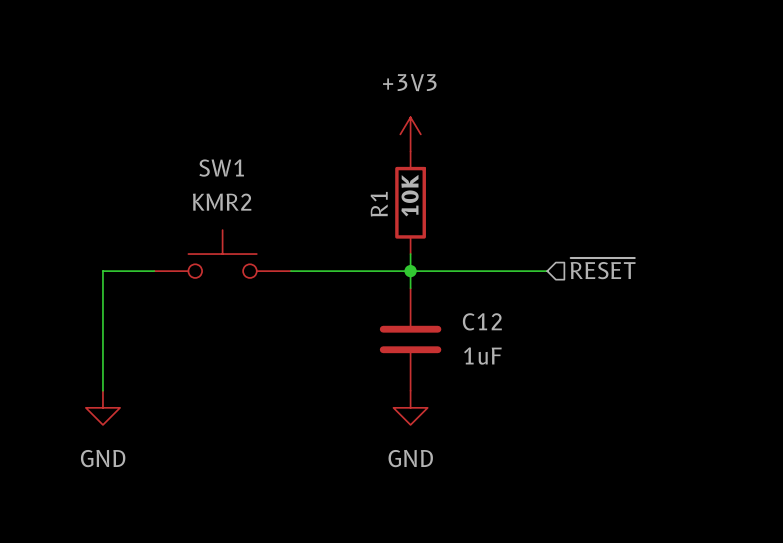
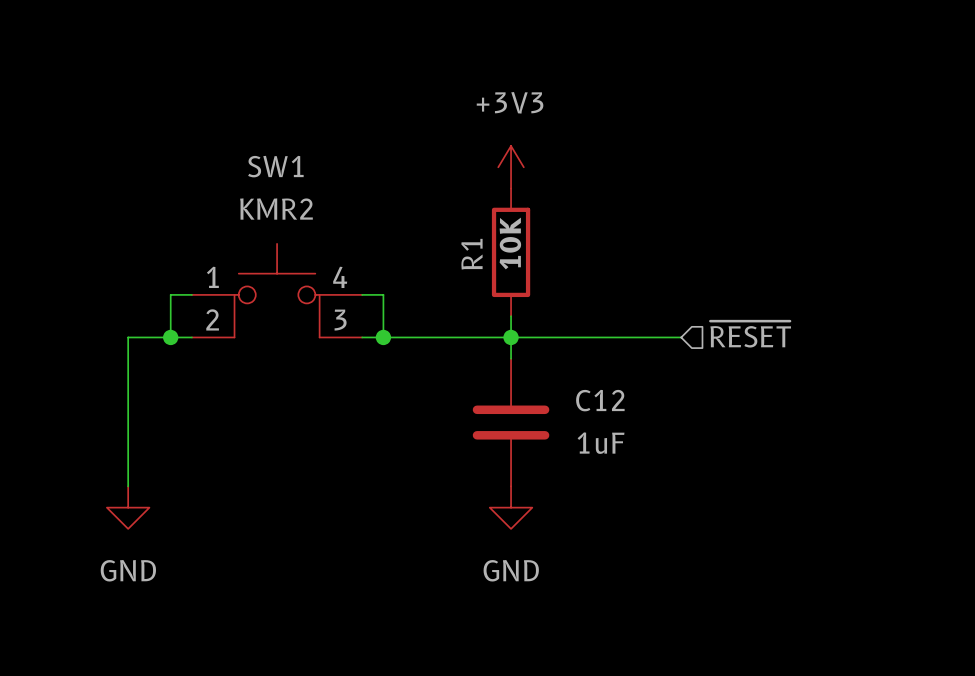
SW1 symbol: [154, 230, 291, 278] -> [191, 243, 363, 338]
wire: none -> (191, 294) (170, 294) (170, 337)
wire: none -> (362, 294) (383, 294) (383, 337)
junction: none -> (170, 337)
junction: none -> (383, 337)

